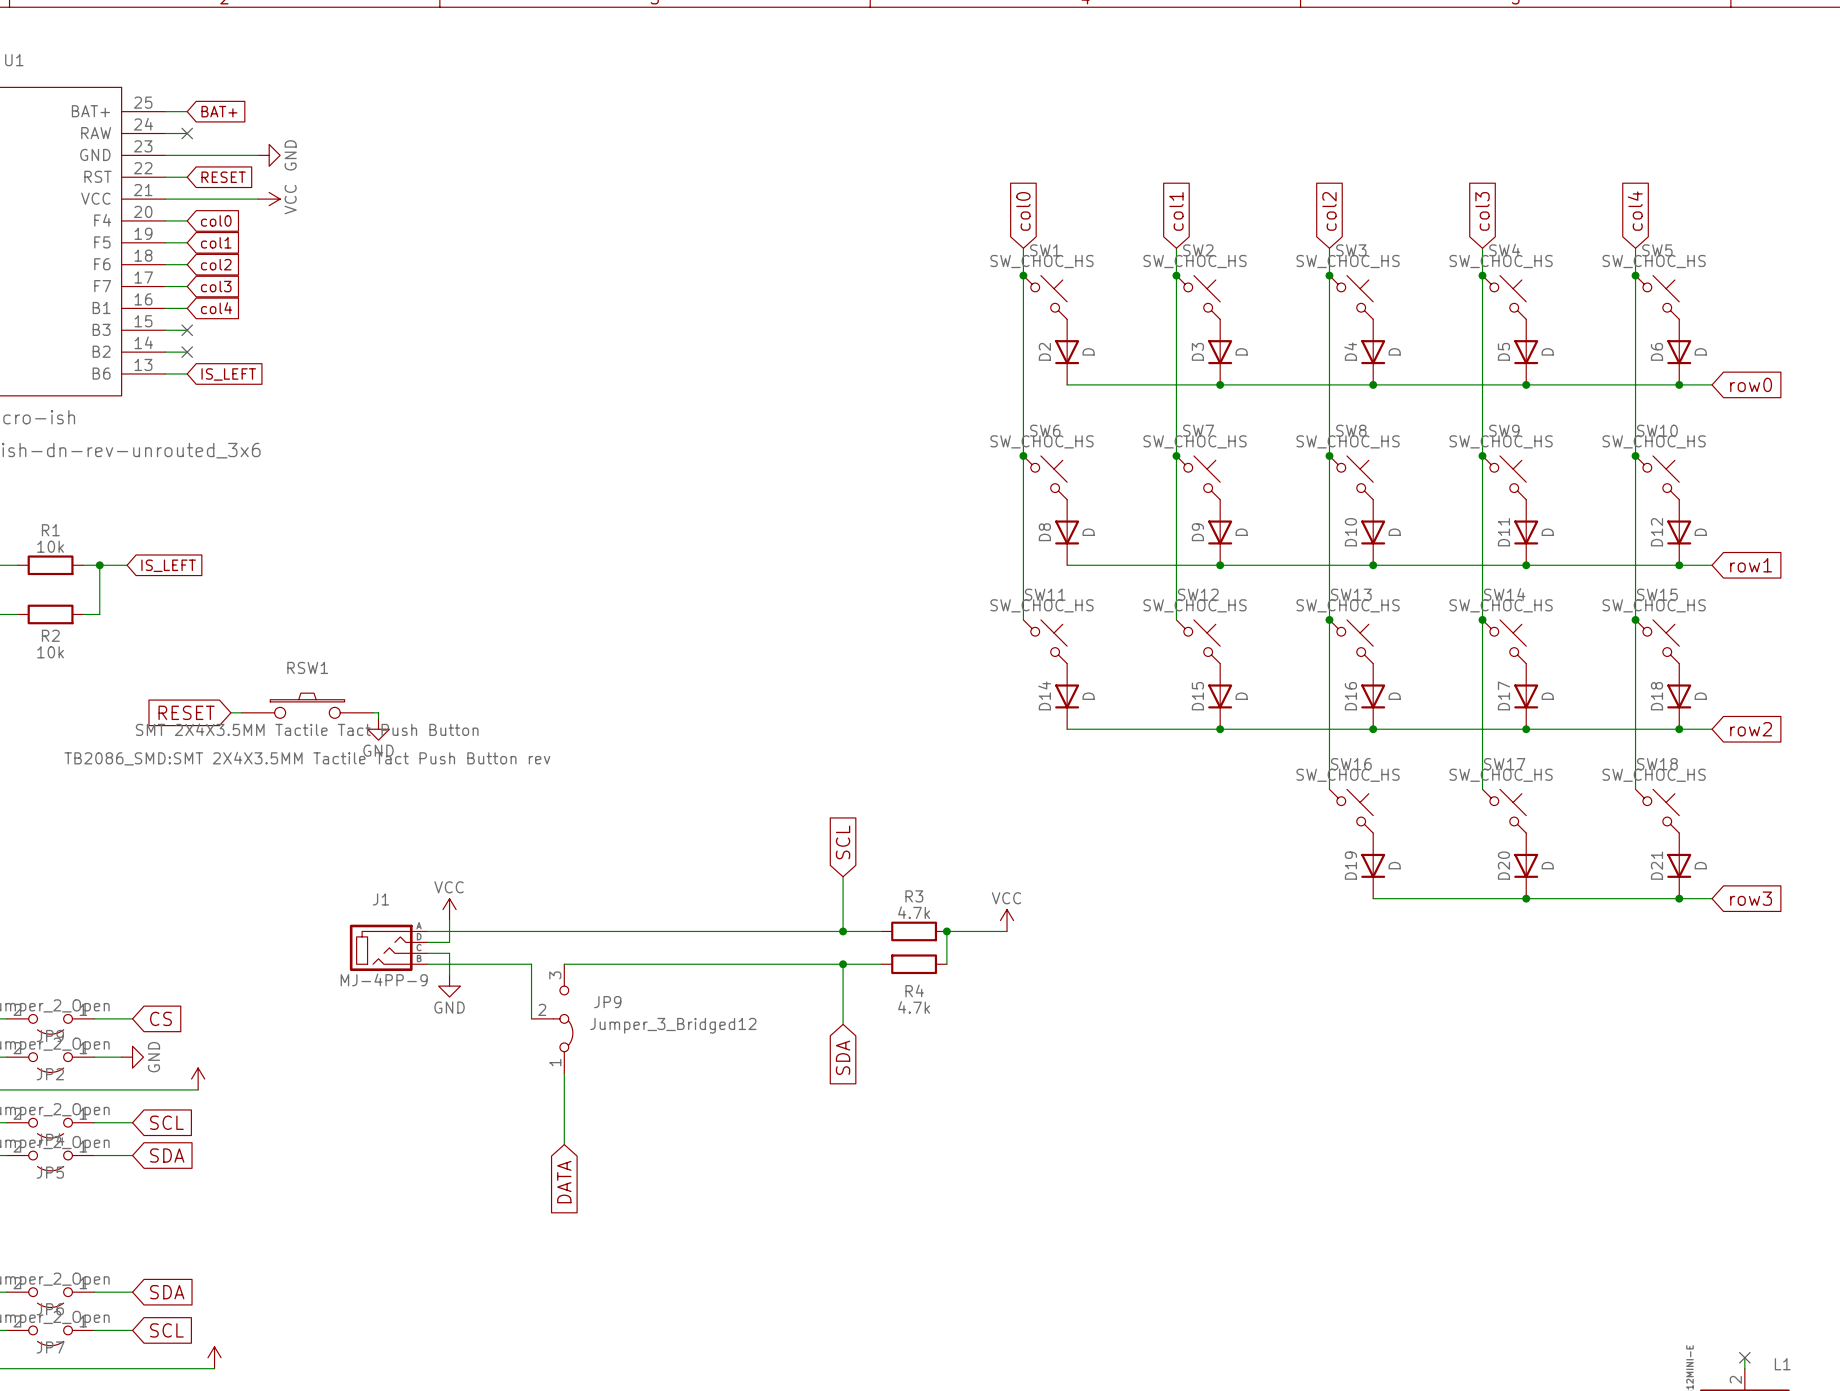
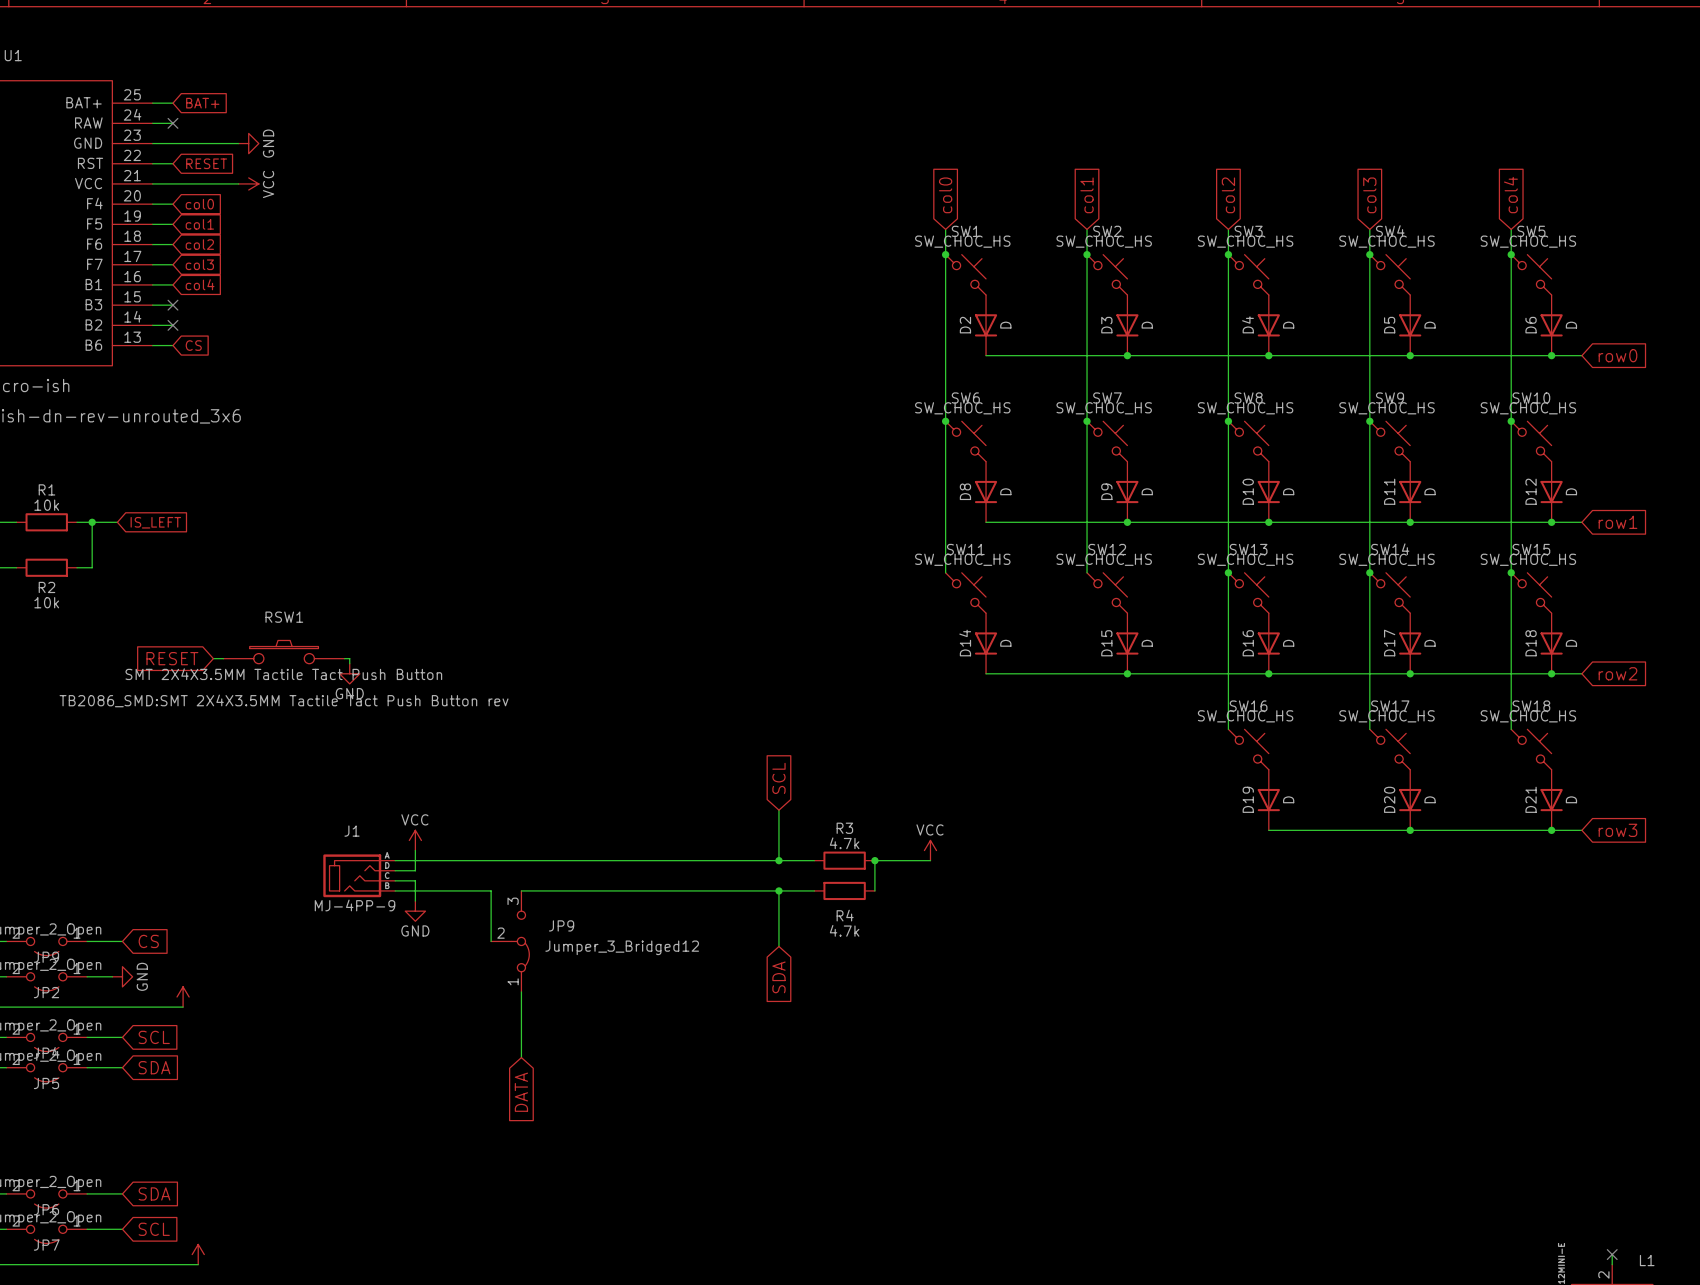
global label: IS_LEFT (228, 374) -> CS (193, 345)

